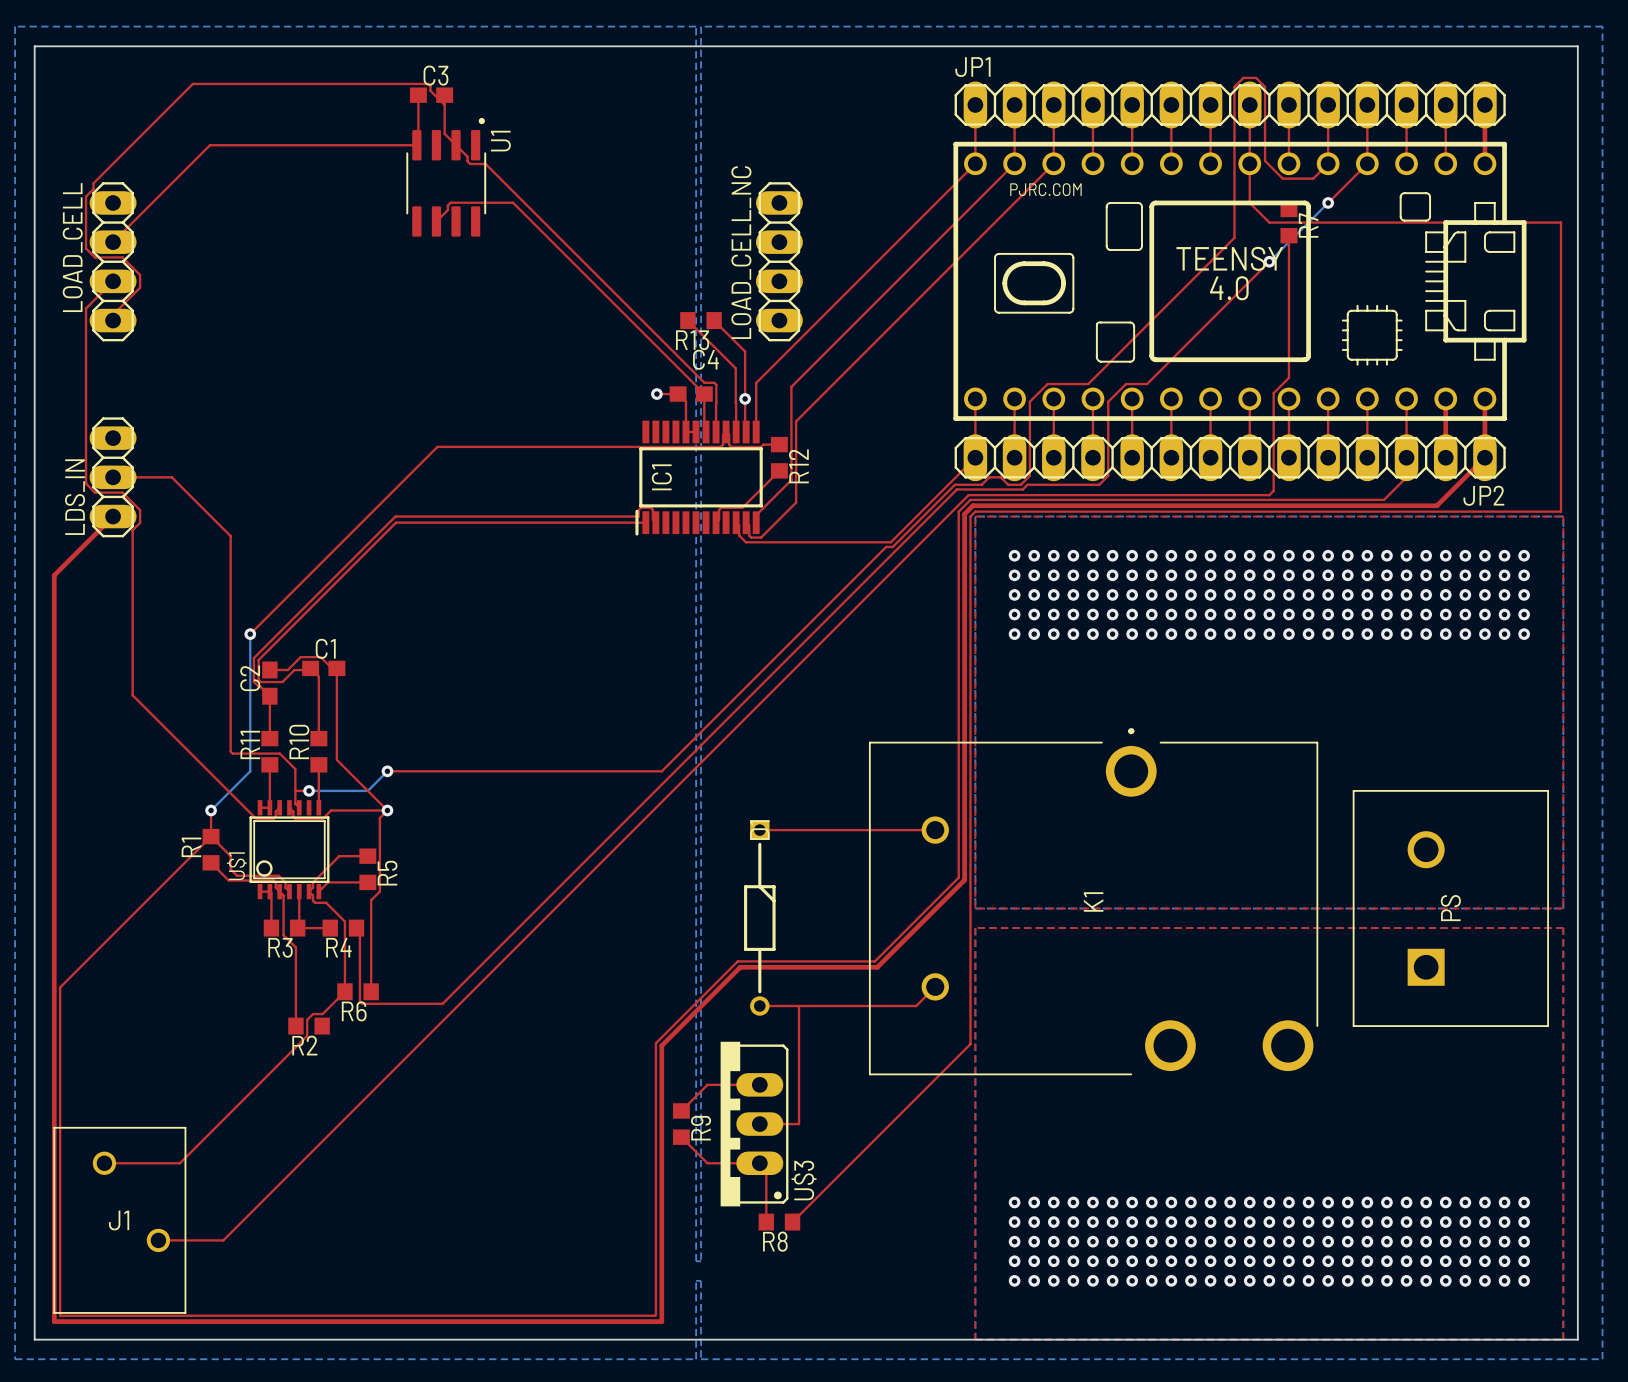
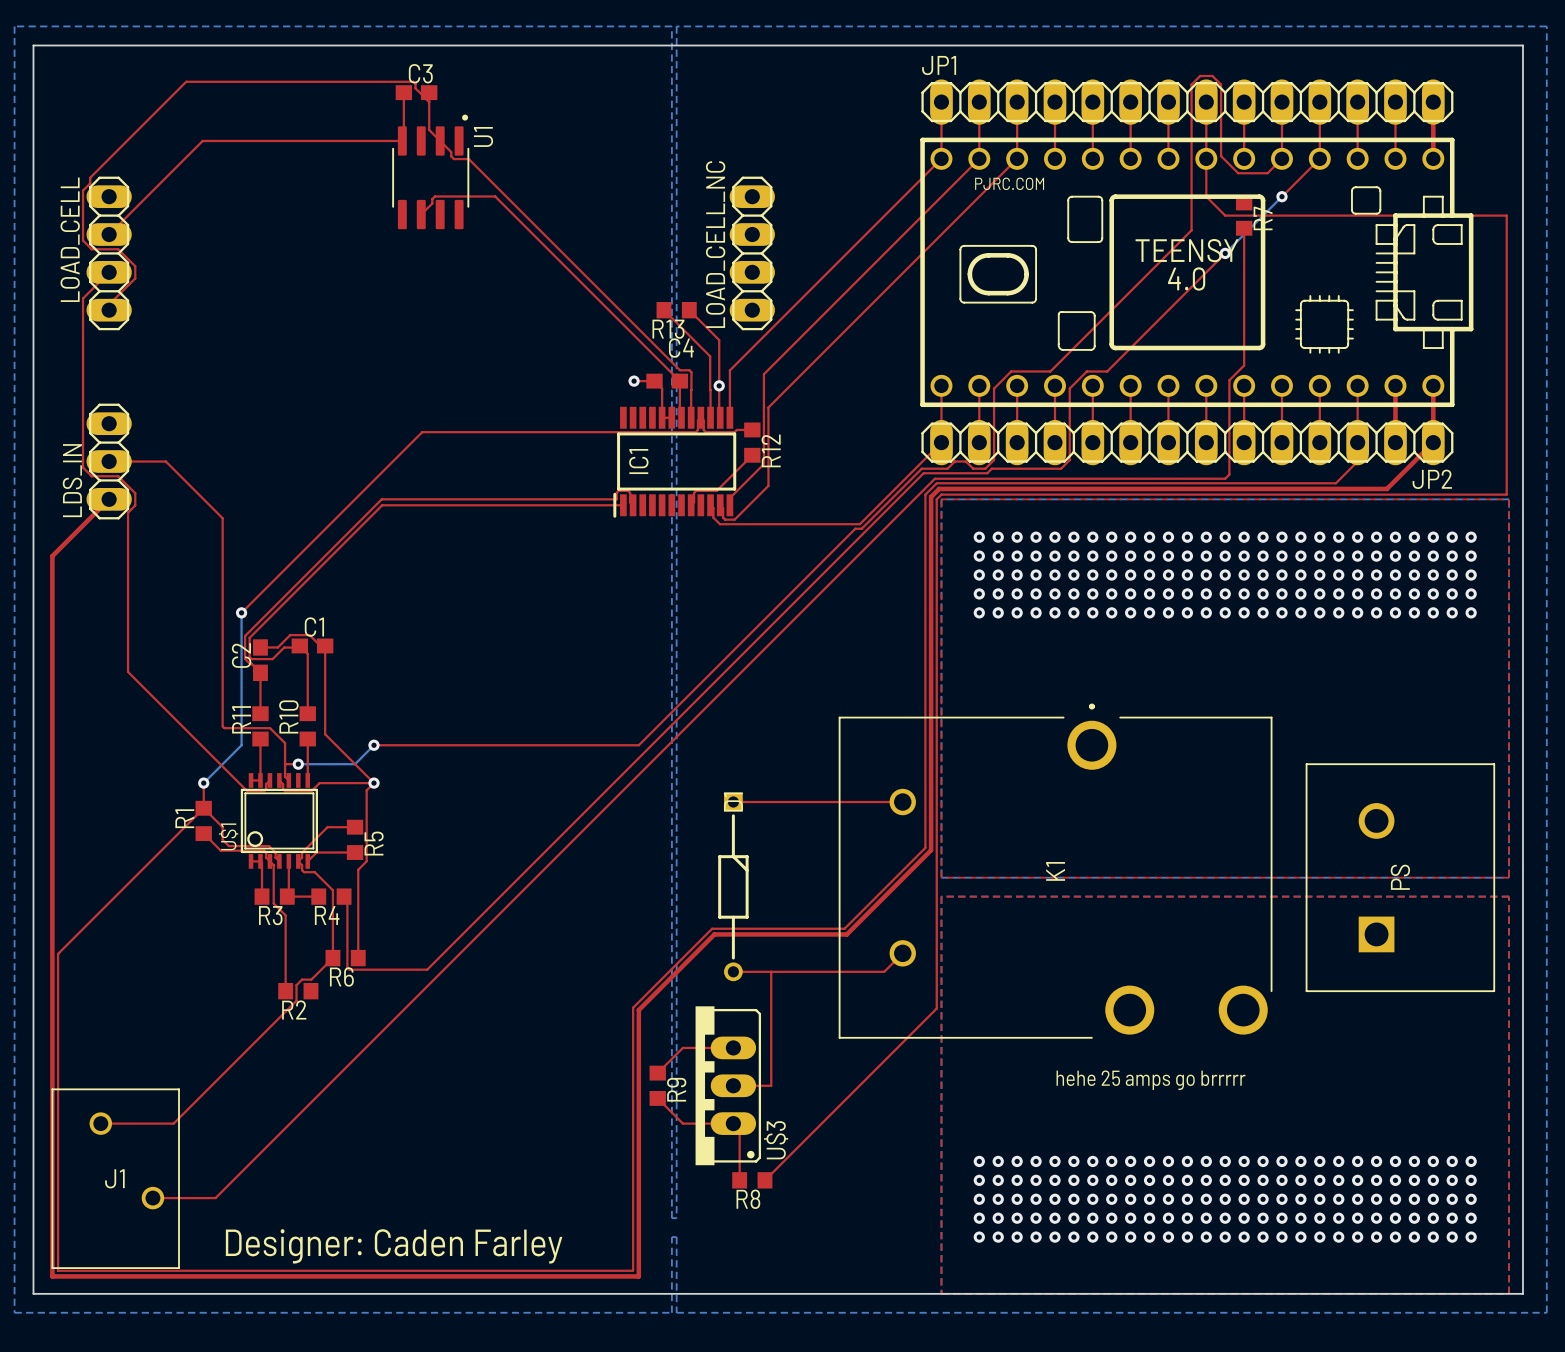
text: none -> hehe 25 amps go brrrrr (1151, 1080)
text: none -> Designer: Caden Farley (394, 1246)

